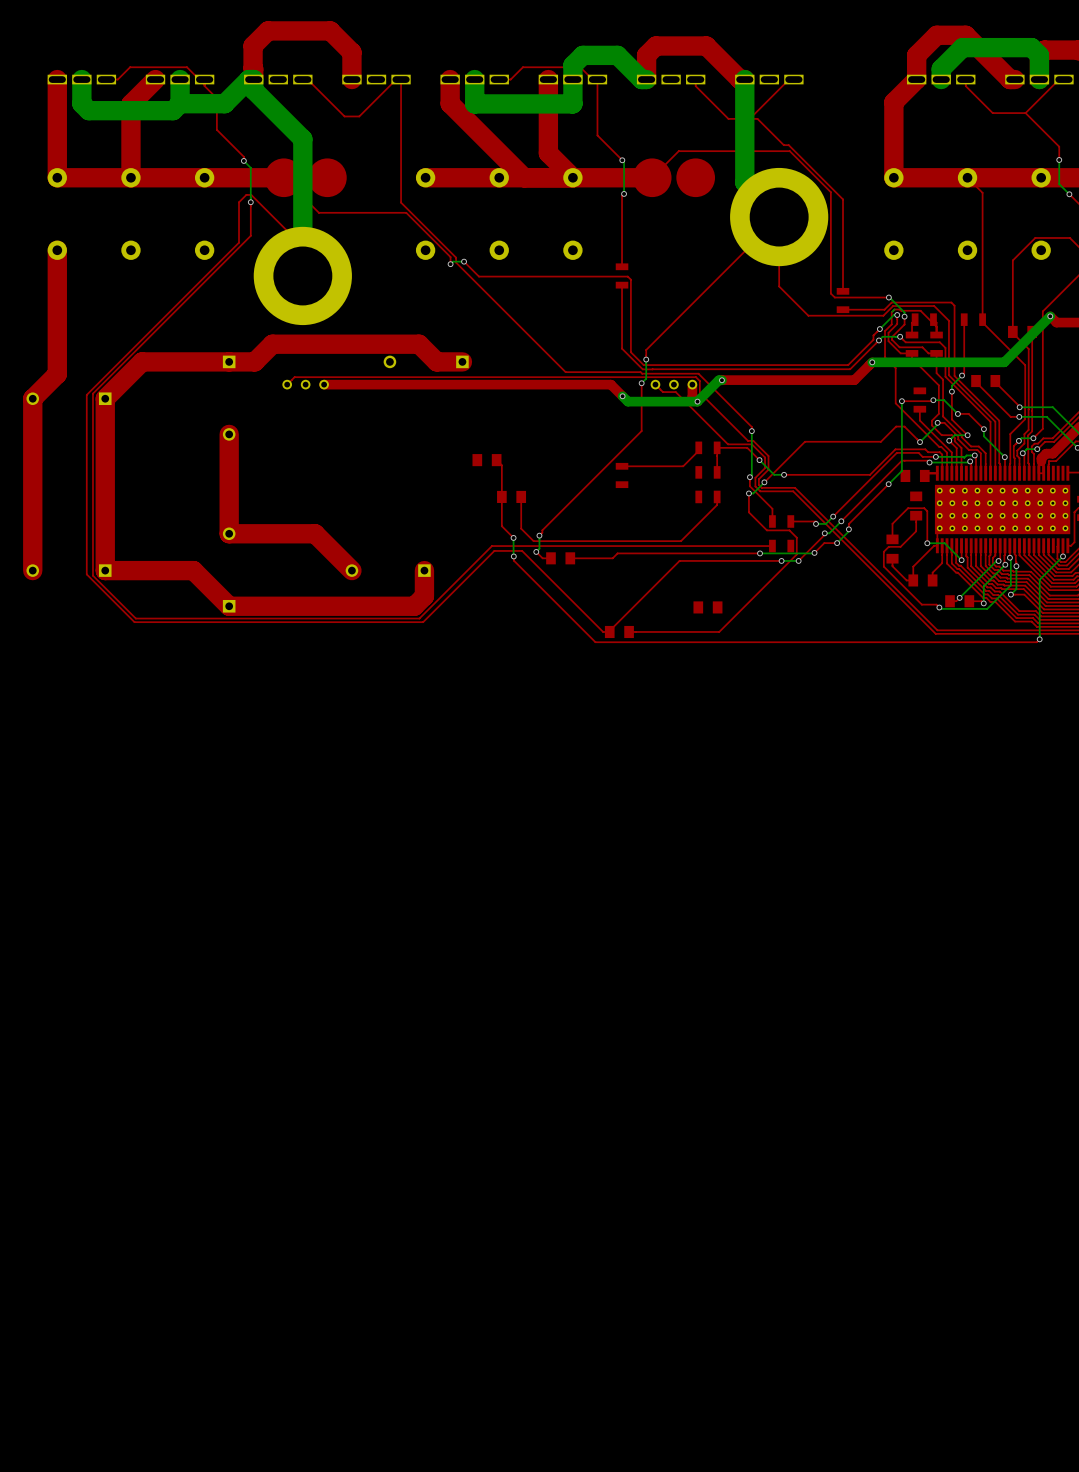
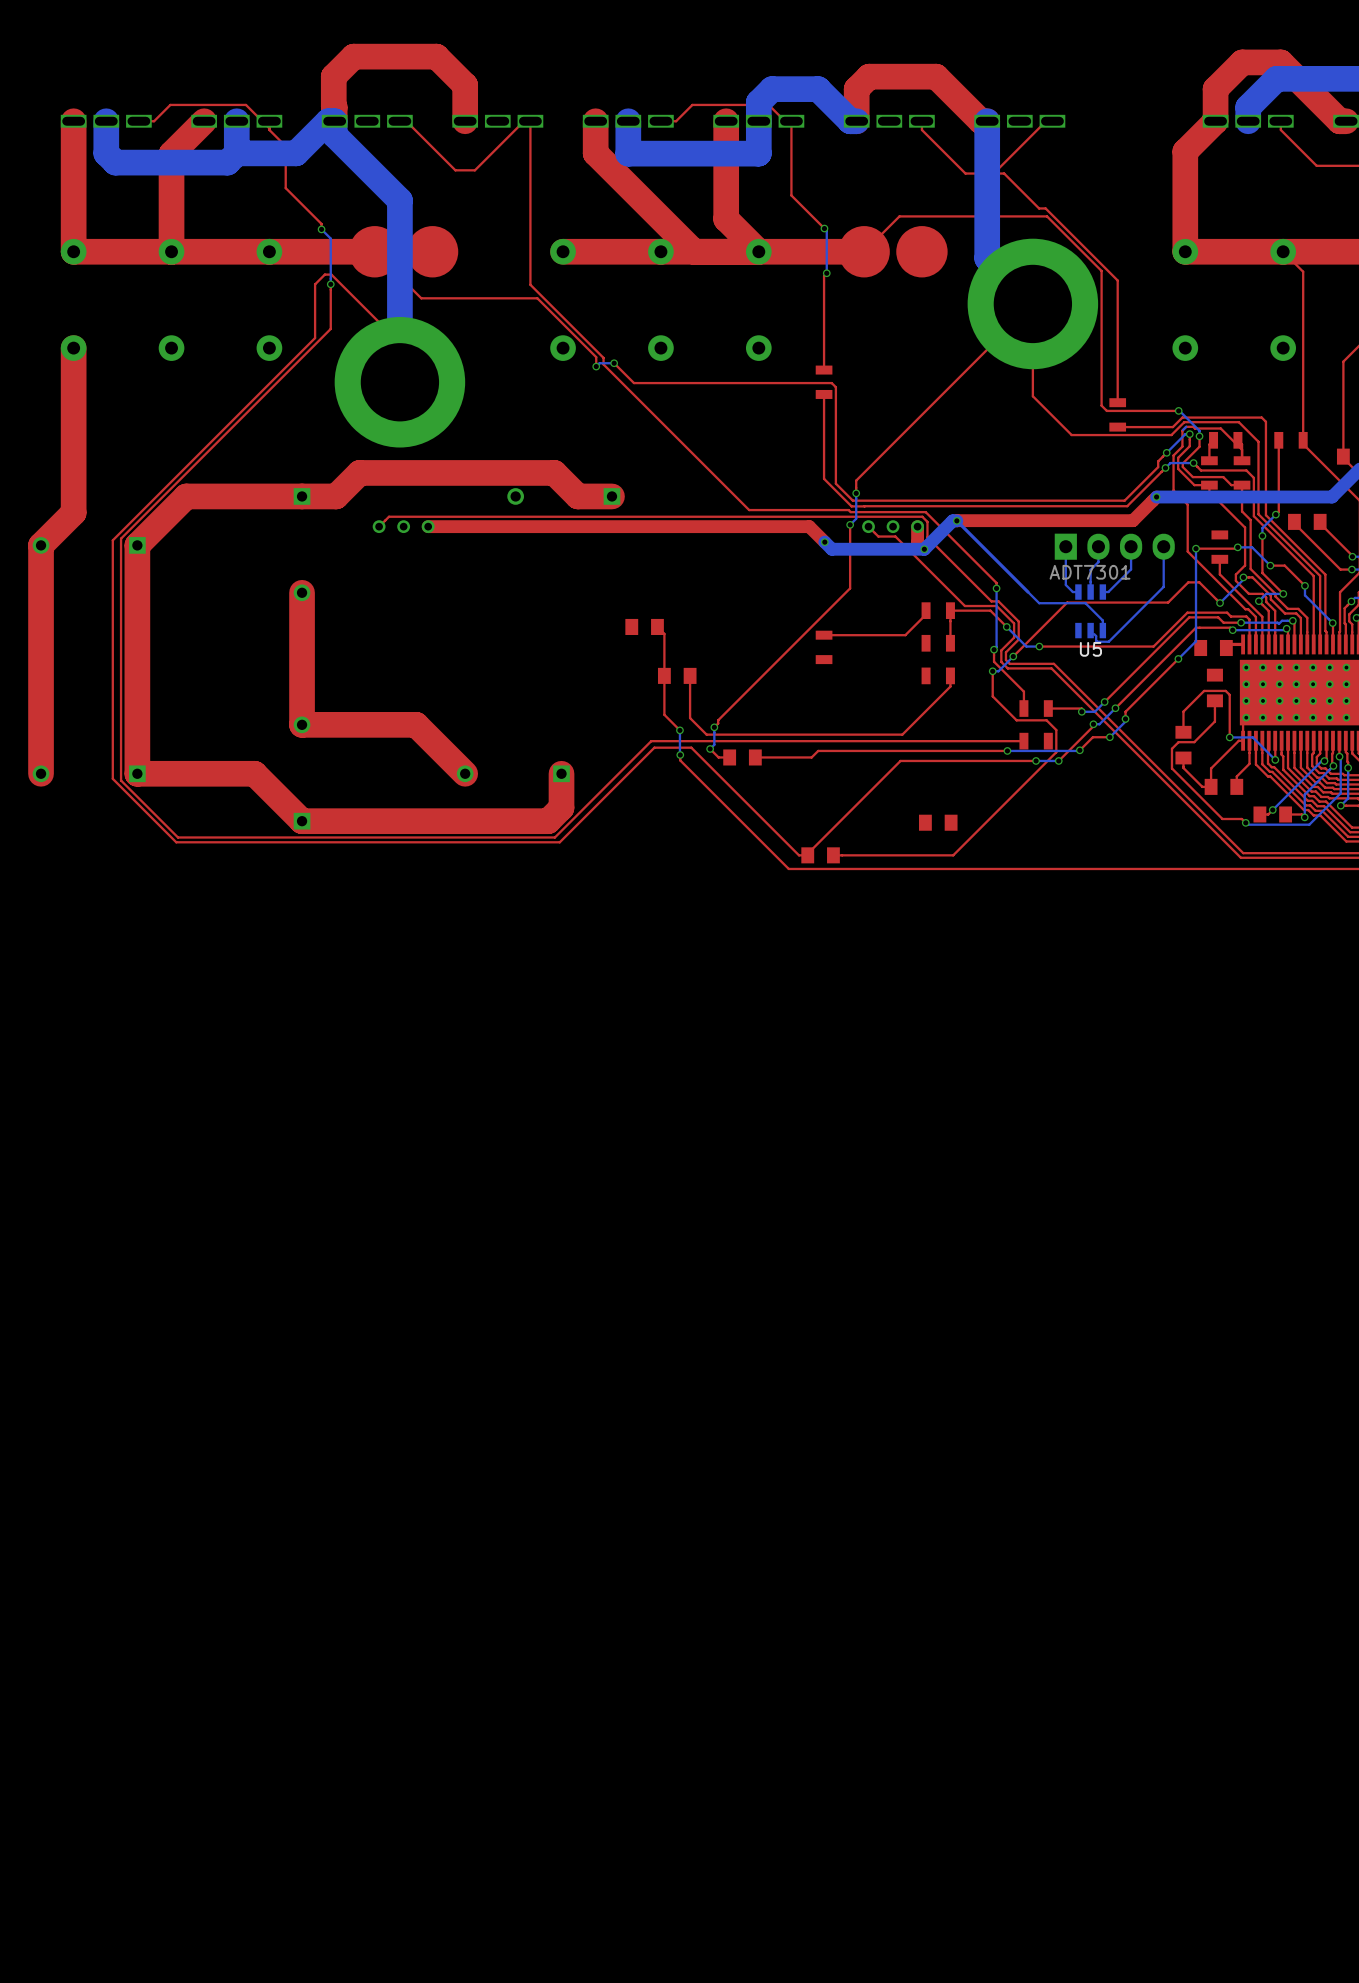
bottom track: none -> (956, 520) (1039, 603) (1085, 603) (1102, 620) (1102, 630)
bottom track: none -> (1065, 546) (1065, 584) (1072, 592) (1078, 592) (1078, 596)
bottom track: none -> (1098, 546) (1098, 562) (1090, 569) (1090, 592)
part: none -> (1114, 546)
bottom track: none -> (1131, 546) (1131, 569) (1108, 592) (1102, 592)
bottom track: none -> (1163, 546) (1163, 586) (1108, 641) (1096, 641) (1094, 634)
U5: none -> ADT7301 (1090, 611)

